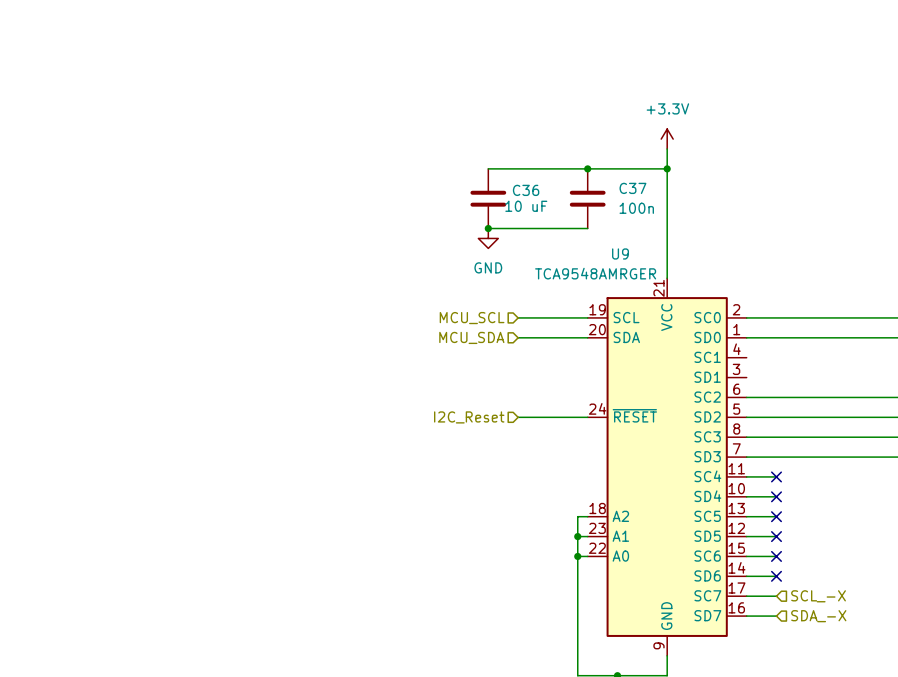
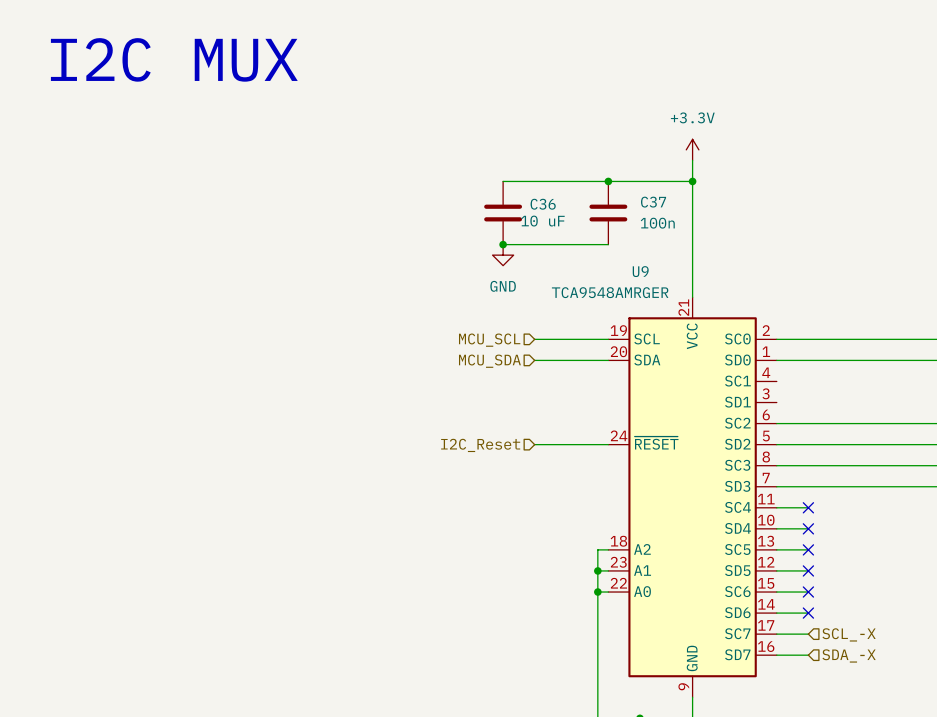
text: none -> I2C MUX (174, 59)

